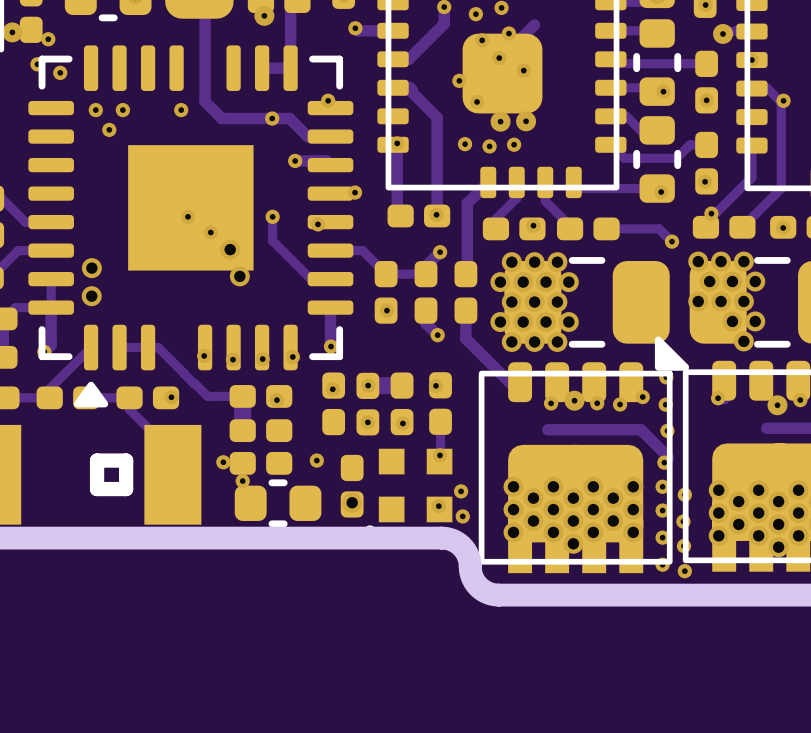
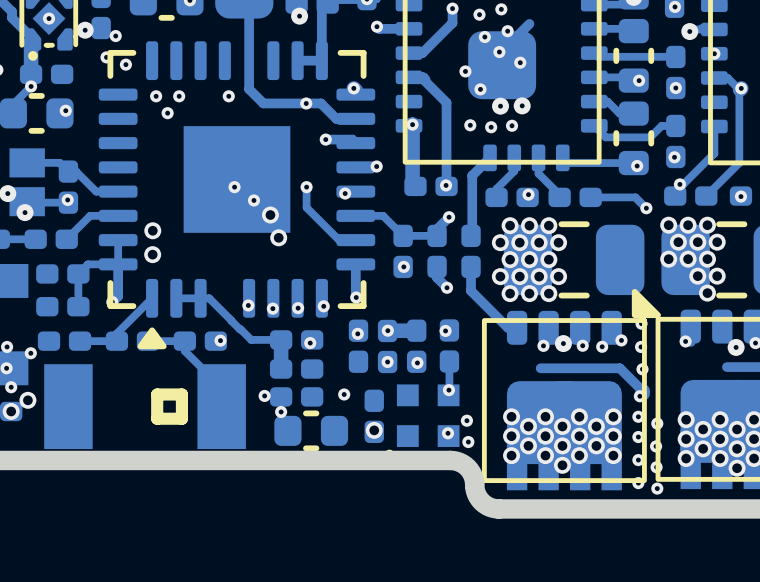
track width: thin (393, 144) (397, 143) (397, 212) (400, 215) -> thick (409, 125) (412, 124) (412, 183) (415, 186)

